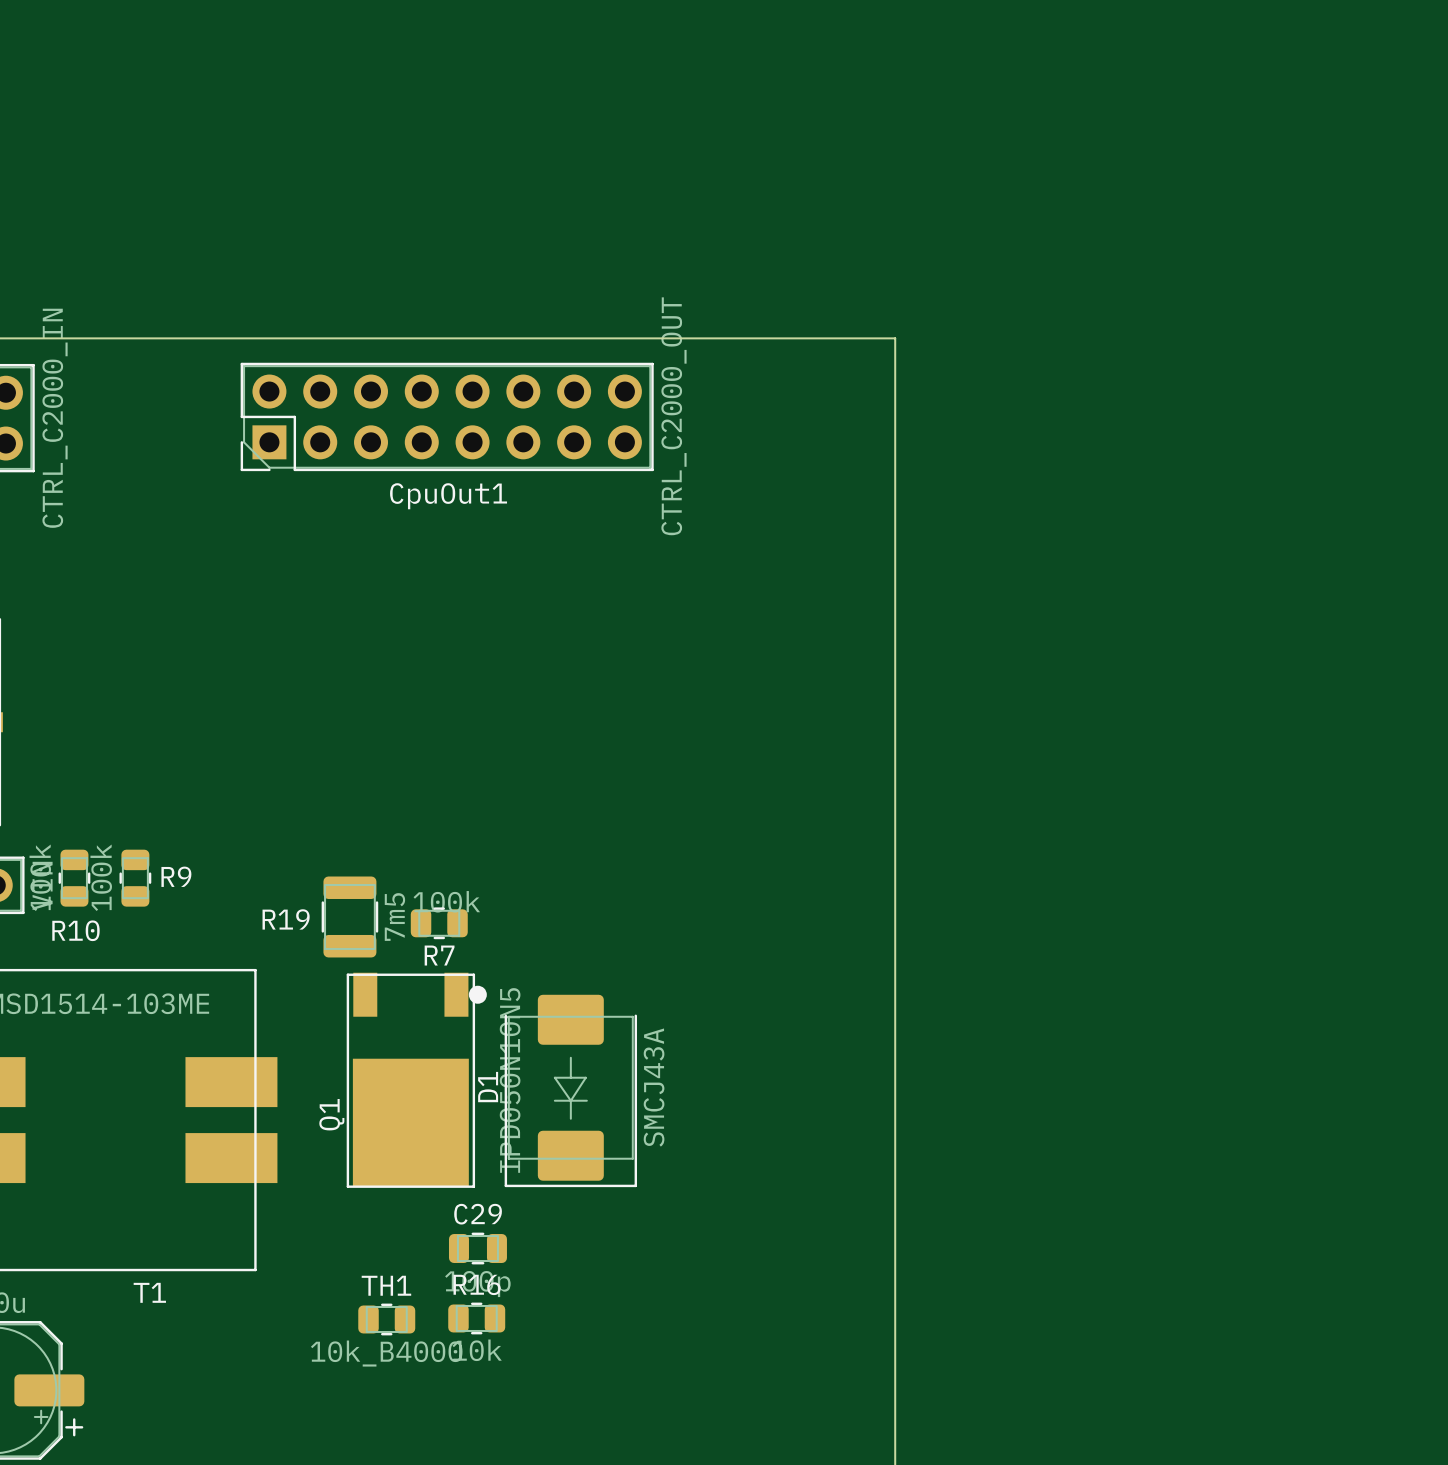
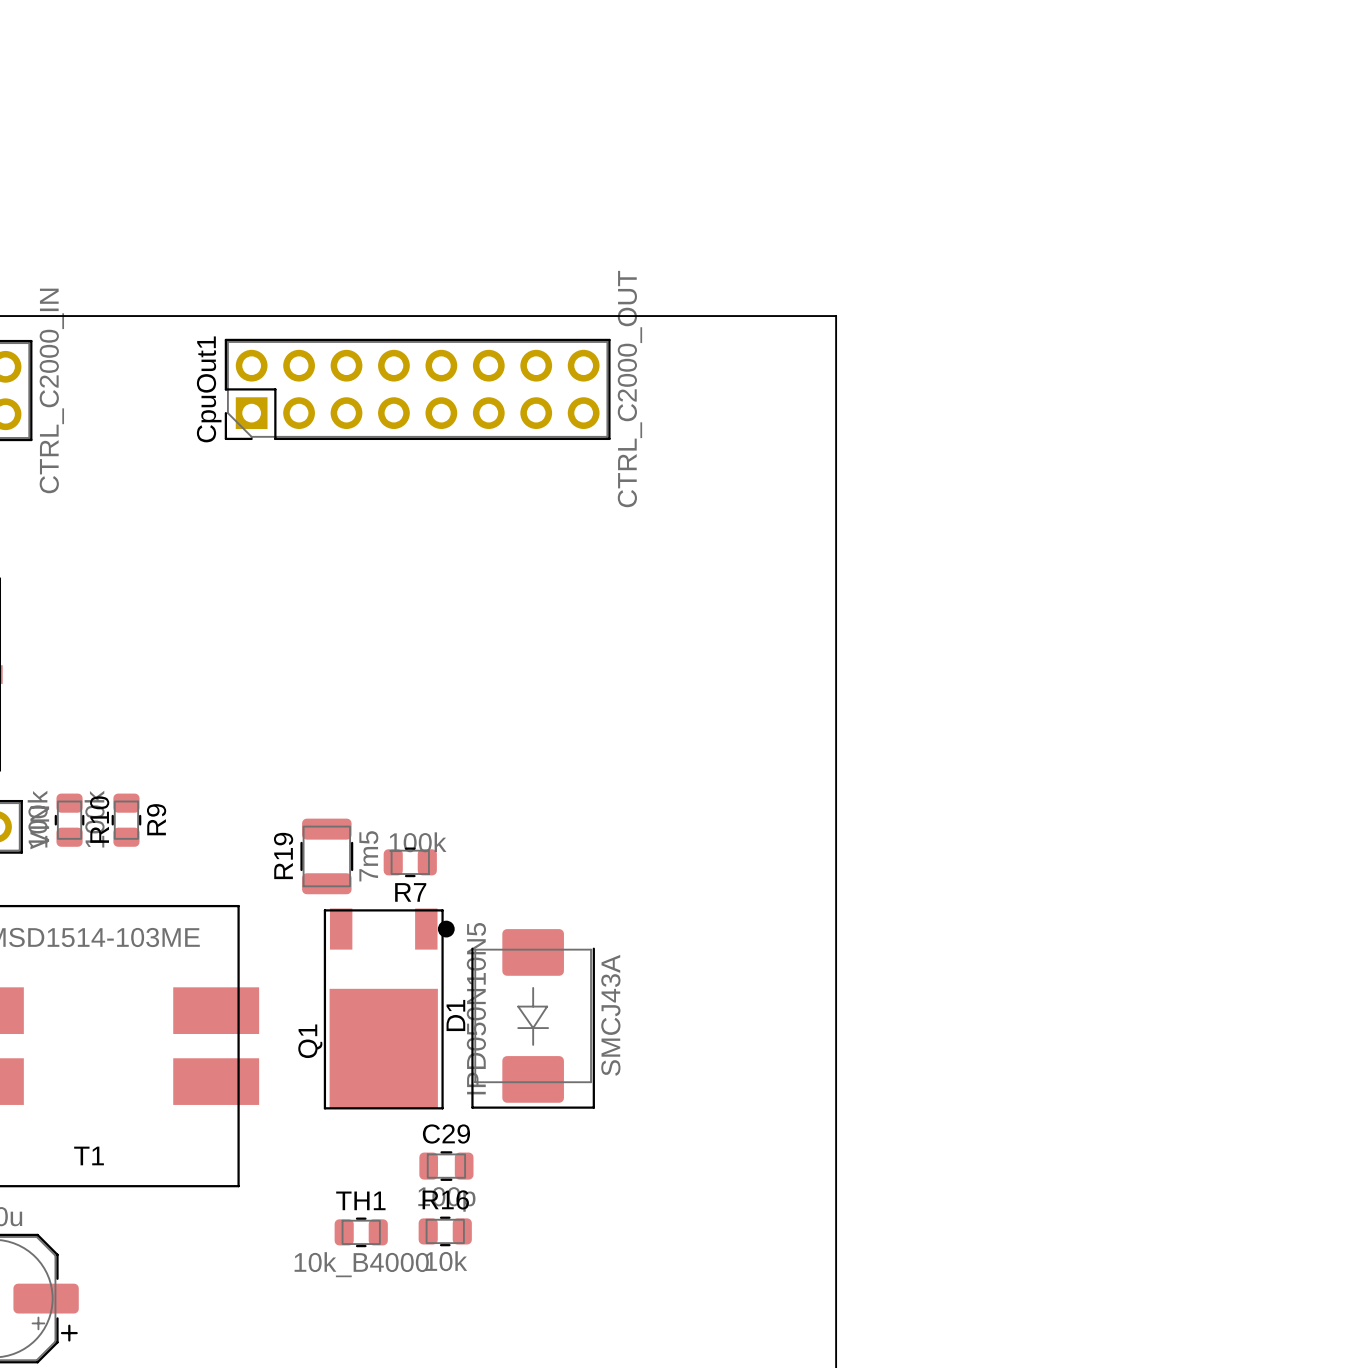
CpuOut1 name rotation: 0° (448, 496) -> 90° counterclockwise (209, 389)
CpuOut1 name position: CpuOut1 (448, 496) -> CpuOut1 (209, 389)
R9 name rotation: 0° (176, 876) -> 90° counterclockwise (156, 819)
R19 name rotation: 0° (286, 919) -> 90° counterclockwise (283, 855)
R10 name rotation: 0° (75, 930) -> 90° counterclockwise (99, 819)
T1 name position: T1 (149, 1292) -> T1 (89, 1155)

